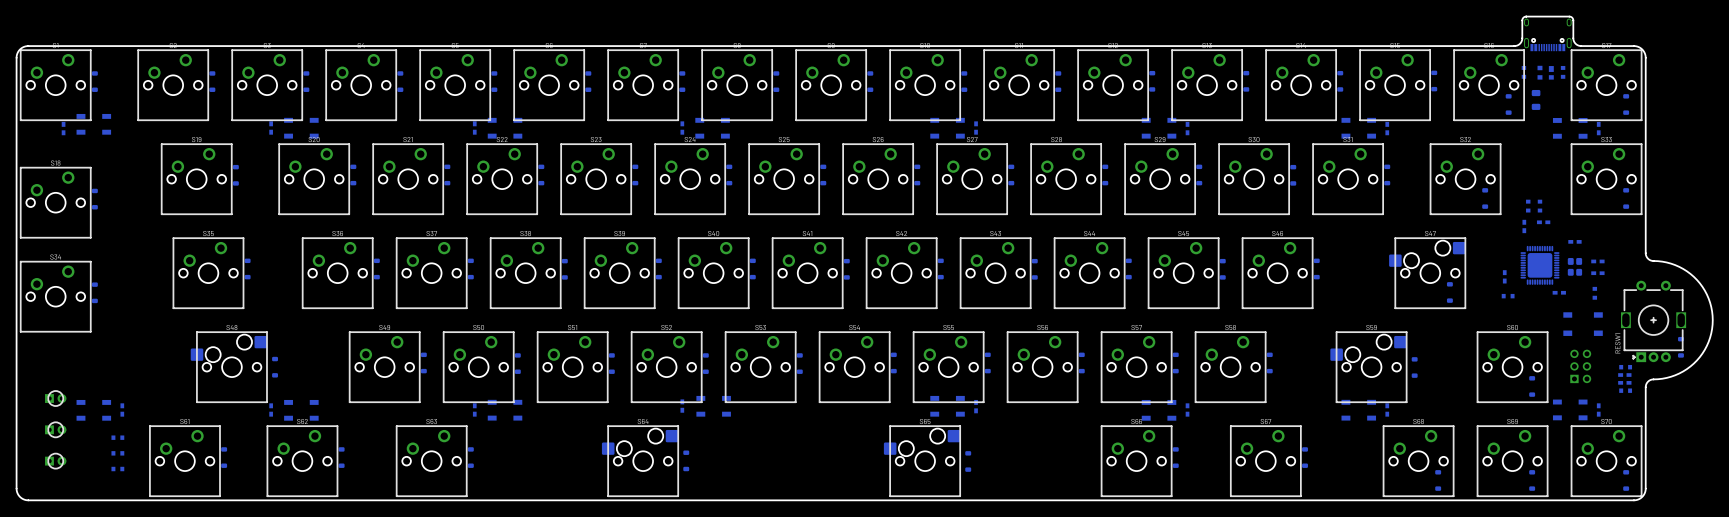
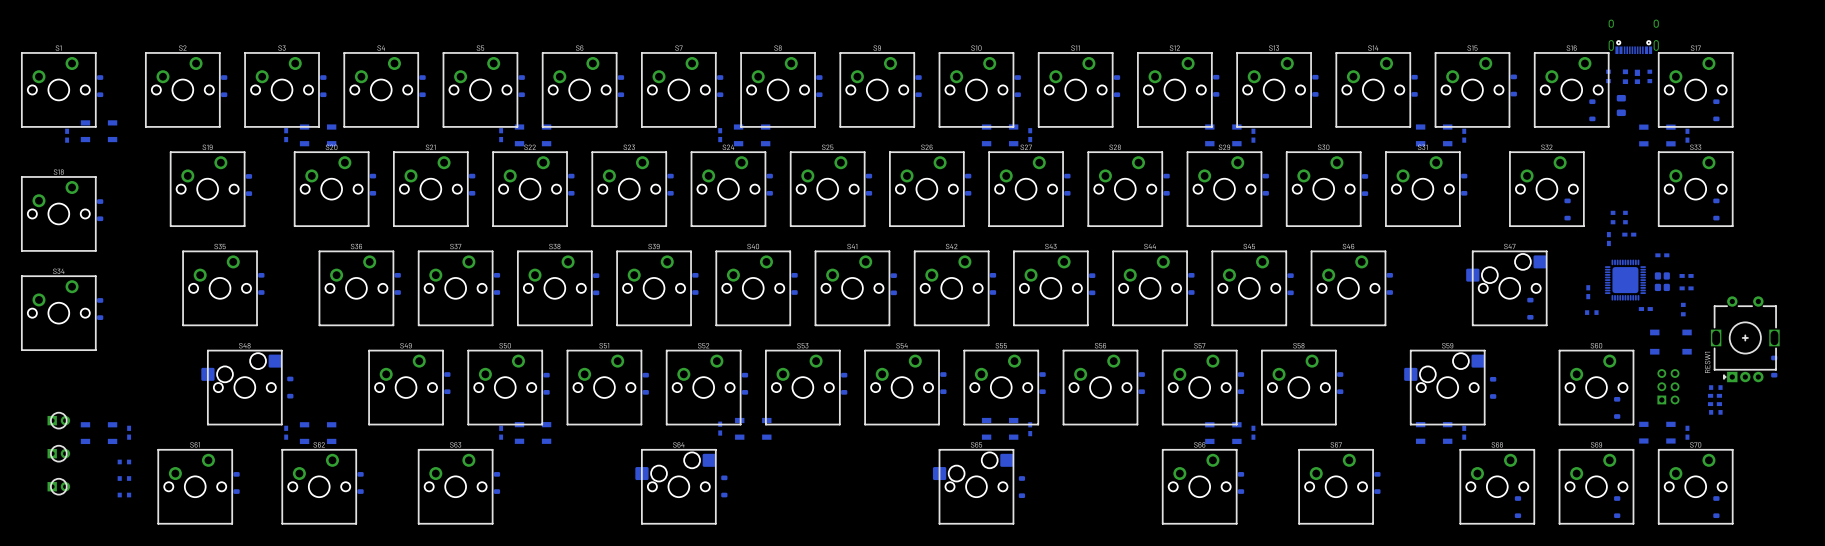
board edge: (1526, 16) (1571, 16) (1573, 20) (1573, 40) (1579, 45) (1635, 46) (1643, 51) (1645, 57) (1645, 254) (1650, 260) (1671, 263) (1690, 273) (1704, 290) (1711, 307) (1711, 333) (1699, 357) (1679, 373) (1666, 377) (1651, 379) (1646, 384) (1645, 489) (1643, 495) (1637, 499) (28, 500) (22, 498) (17, 492) (16, 57) (18, 50) (25, 46) (1514, 46) (1521, 41) (1522, 19) (1526, 16) -> none

